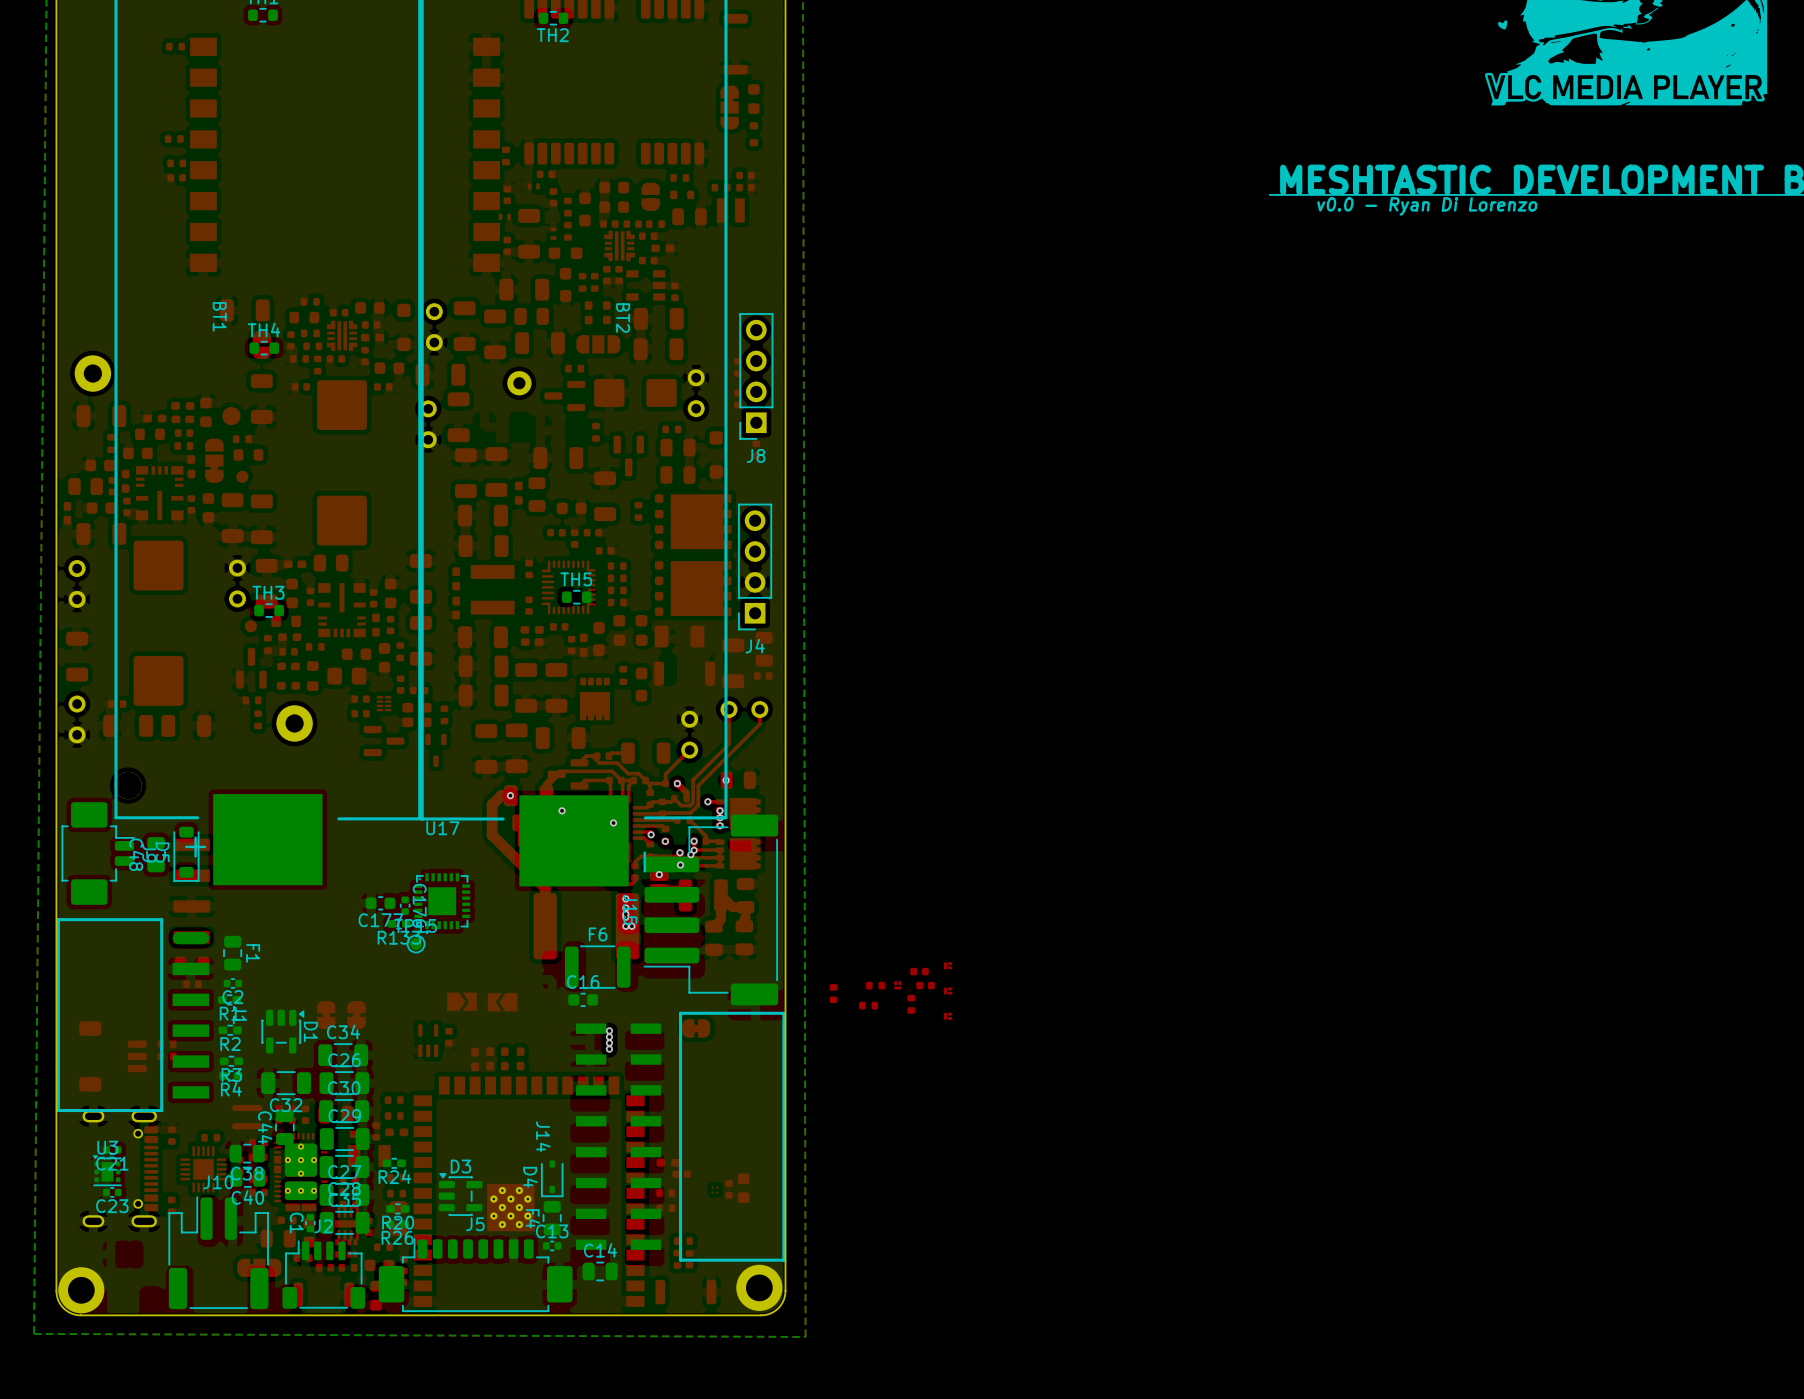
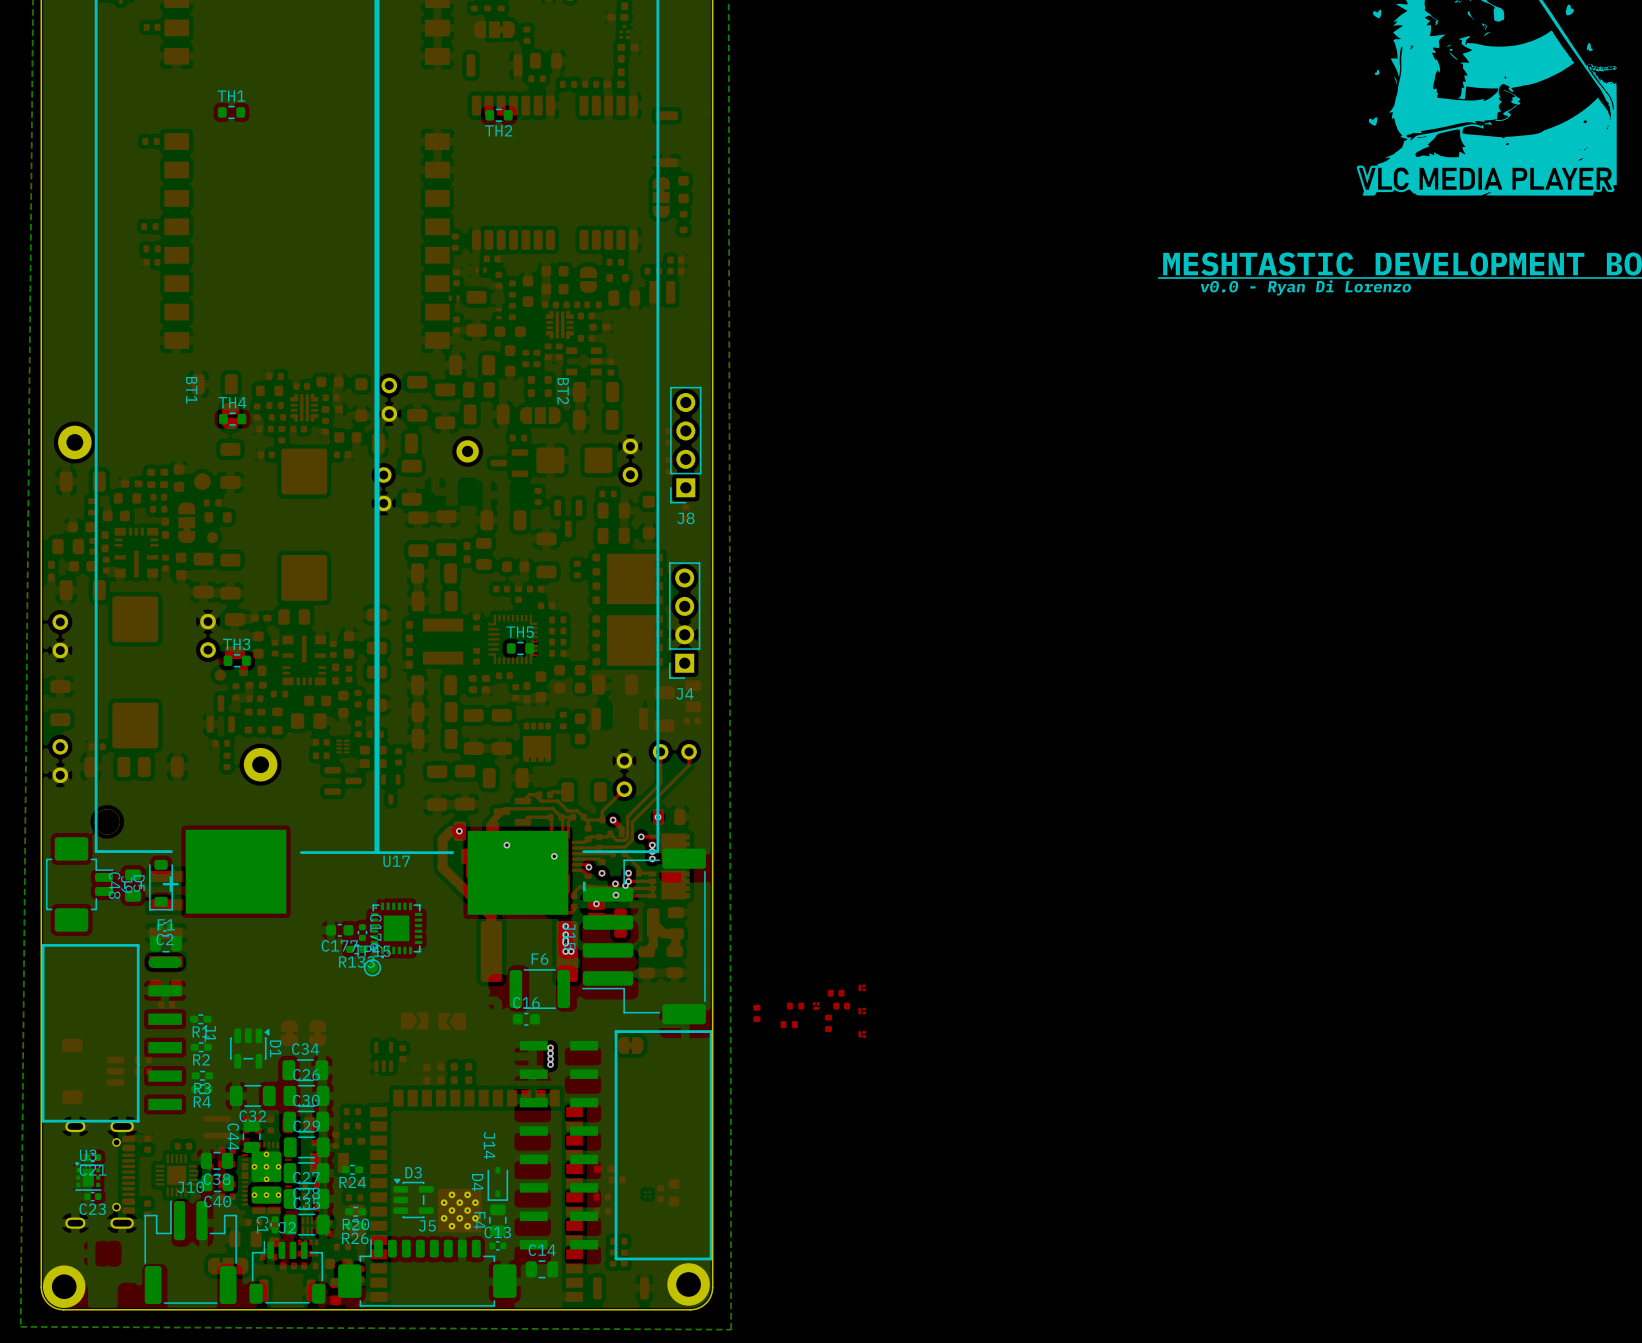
F1 rotation: 0° (232, 953) -> 90° clockwise (165, 943)
F1 position: (232, 953) -> (165, 943)
F1 name position: F1 (253, 953) -> F1 (166, 924)
C2 position: (232, 983) -> (164, 926)
part footprint: [334, 1207, 362, 1241] -> [301, 1217, 319, 1234]

